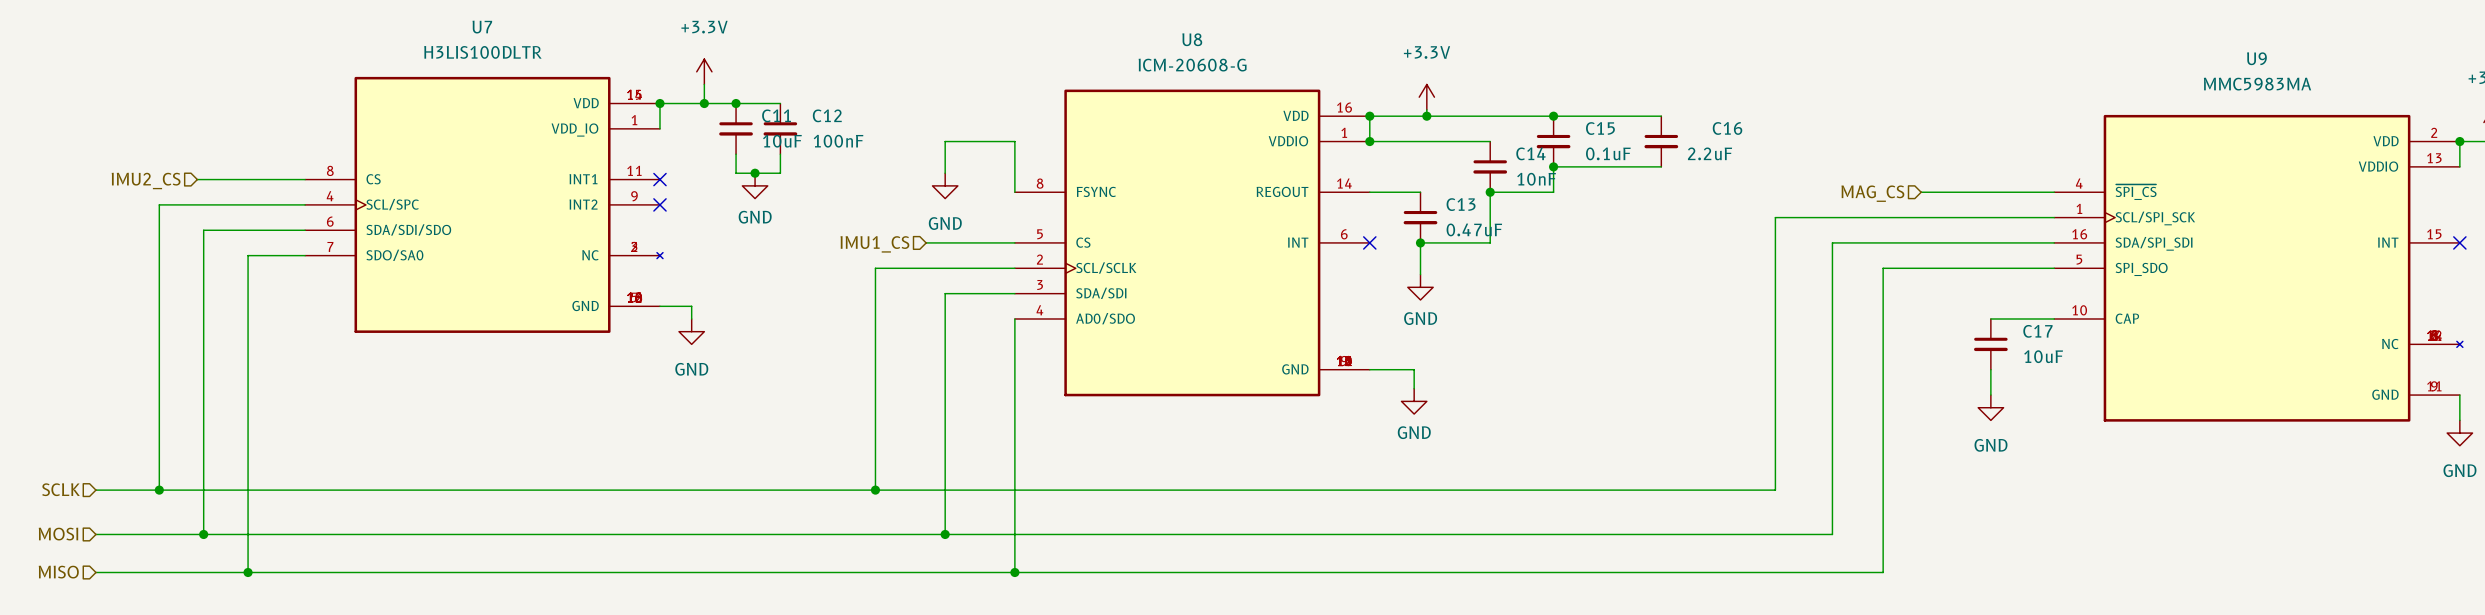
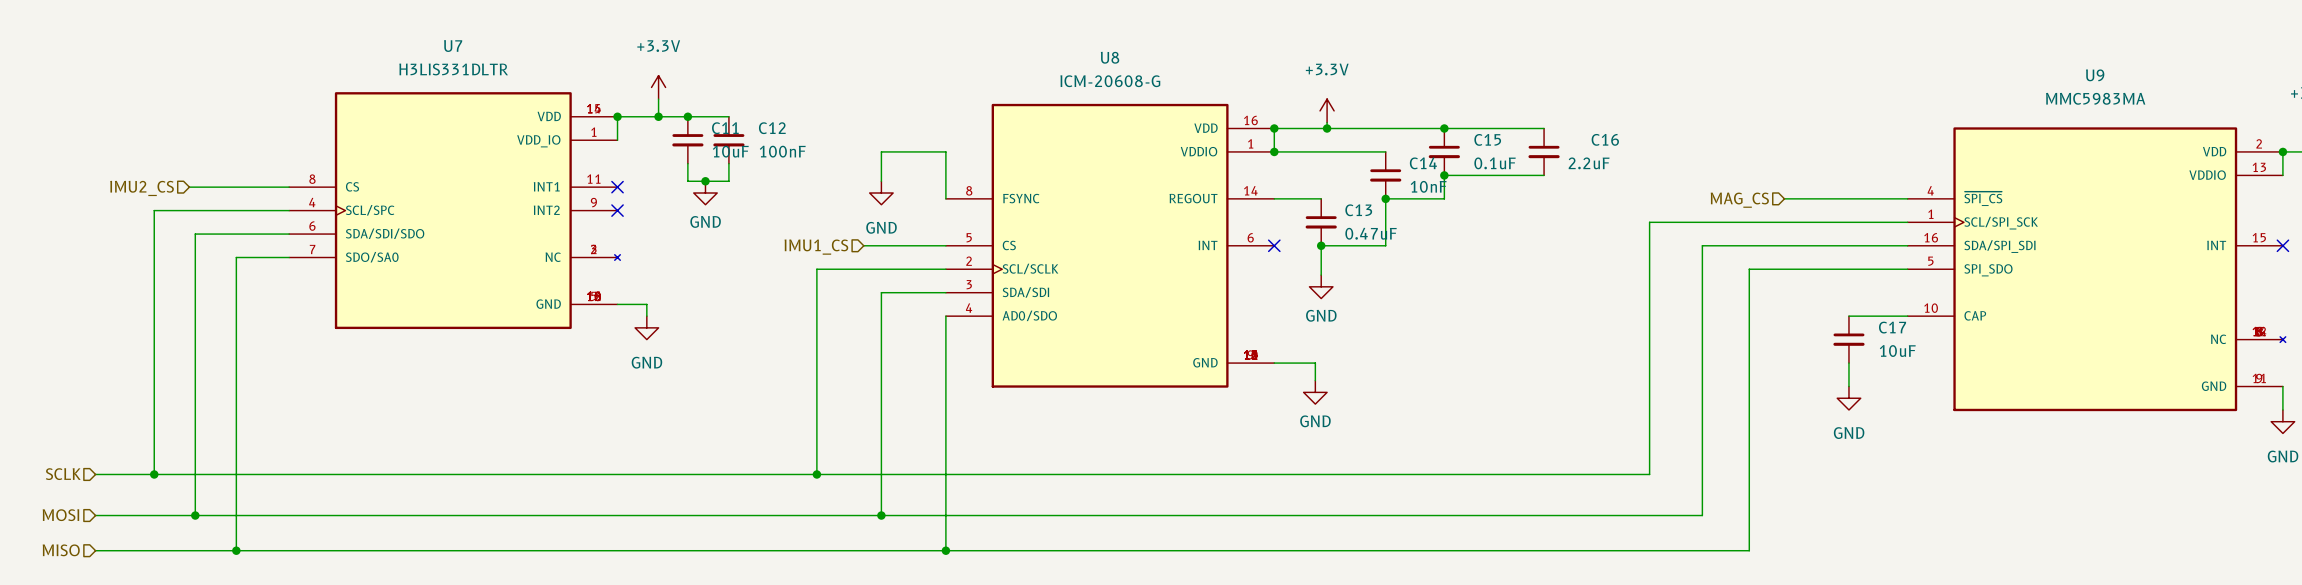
U7 value: H3LIS100DLTR (482, 52) -> H3LIS331DLTR (453, 69)

